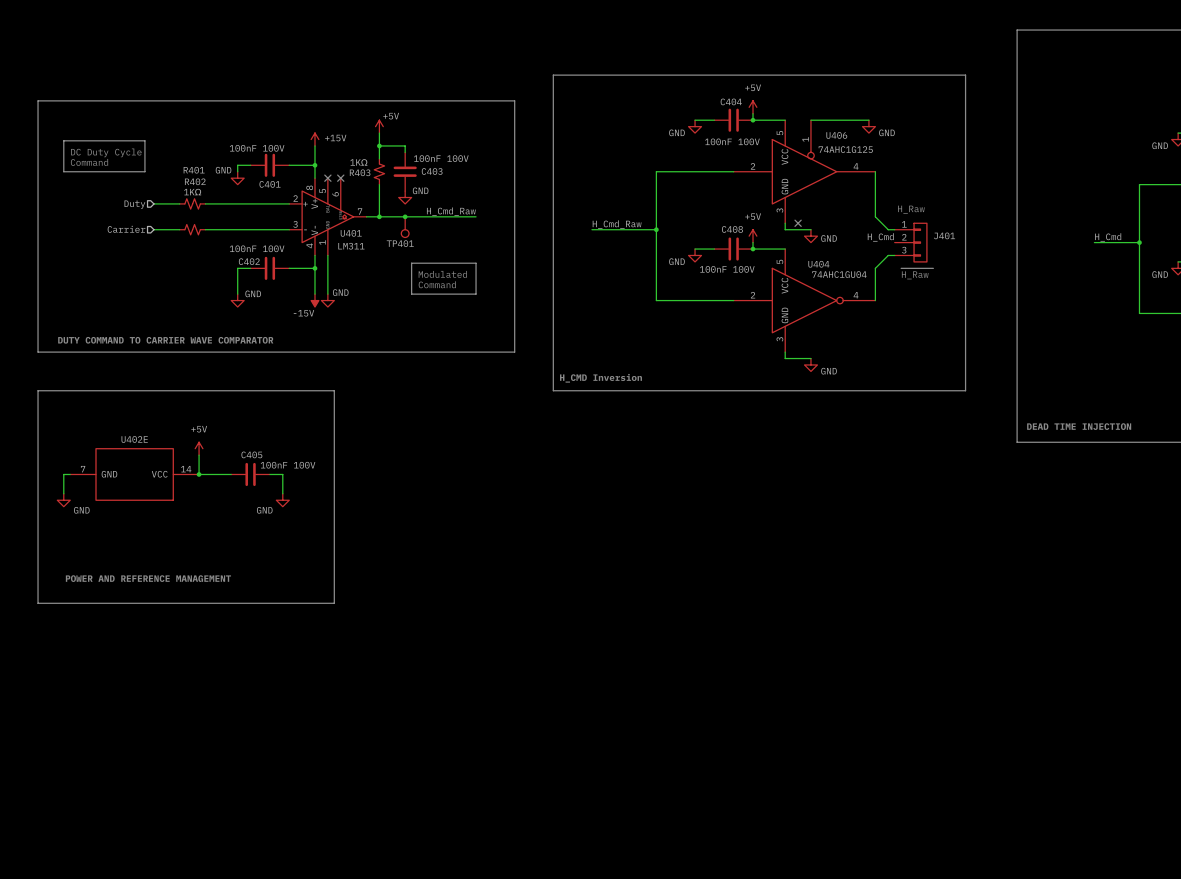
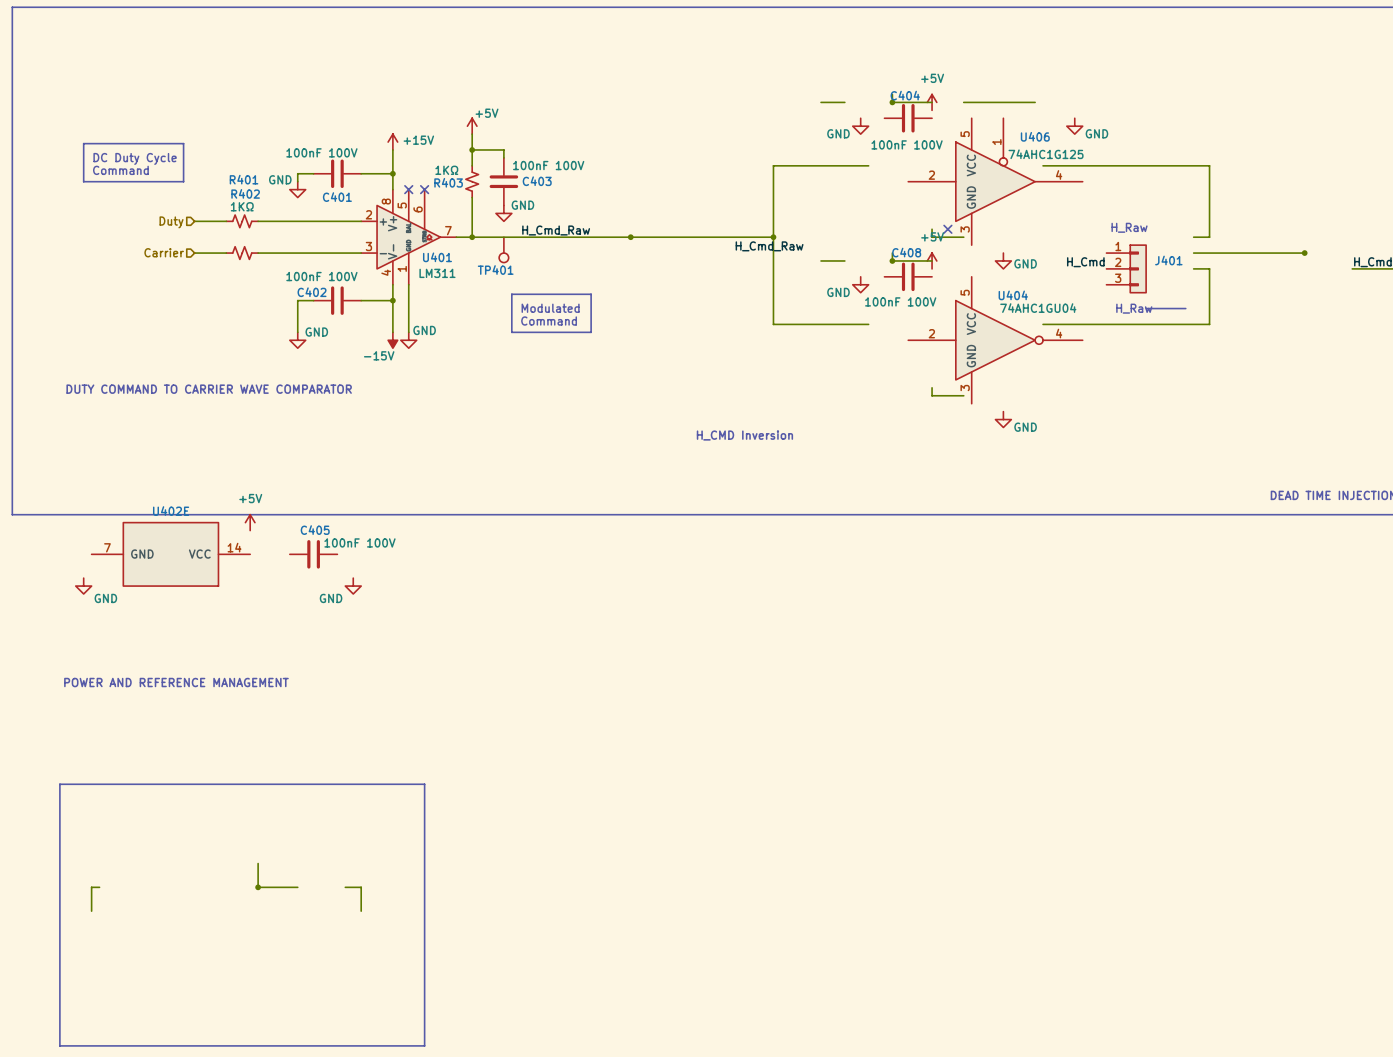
line: (1017, 30) (1017, 442) -> (1257, 7) (12, 7) (12, 514) (1257, 514)
line: (553, 75) (965, 75) (965, 390) (553, 390) (553, 75) -> none
line: (38, 100) (514, 100) (514, 352) (38, 352) (38, 100) -> none
junction: none -> (892, 102)
wire: (753, 113) (753, 120) (785, 120) -> (892, 94) (892, 102) (932, 102)
wire: (695, 120) (714, 120) -> (821, 102) (844, 102)
junction: (753, 120) -> none
wire: (810, 120) (868, 120) -> (963, 102) (1035, 102)
wire: none -> (1043, 165) (1209, 165) (1209, 237) (1193, 237)
wire: (733, 171) (656, 171) (656, 300) (733, 300) -> (868, 165) (773, 165) (773, 324) (868, 324)
wire: (875, 171) (875, 216) (888, 229) (894, 229) -> none
no-connect mark: none -> (947, 229)
junction: (405, 216) -> none
wire: none -> (591, 237) (773, 237)
junction: none -> (630, 237)
junction: none -> (773, 237)
wire: (785, 223) (785, 229) (810, 229) -> (932, 229) (932, 237) (963, 237)
no-connect mark: (798, 223) -> none
wire: (591, 229) (656, 229) -> none
junction: (656, 229) -> none
wire: none -> (1193, 253) (1304, 253)
junction: none -> (1304, 253)
junction: none -> (892, 260)
wire: (753, 242) (753, 249) (785, 249) -> (892, 253) (892, 260) (932, 260)
wire: none -> (1193, 268) (1209, 268) (1209, 324) (1043, 324)
wire: (695, 249) (714, 249) -> (821, 260) (844, 260)
junction: (753, 249) -> none
wire: (894, 255) (888, 255) (875, 268) (875, 300) -> none
line: (901, 268) (933, 268) -> (1146, 308) (1185, 308)
wire: (785, 352) (785, 358) (810, 358) -> (932, 387) (932, 395) (963, 395)
line: (38, 390) (38, 603) (334, 603) (334, 390) (38, 390) -> none
wire: (199, 455) (199, 474) (231, 474) -> none
wire: (70, 474) (63, 474) (63, 493) -> none
junction: (199, 474) -> none
wire: (269, 474) (282, 474) (282, 493) -> none
line: none -> (59, 784) (424, 784) (424, 1045) (59, 1045) (59, 784)
wire: none -> (258, 863) (258, 887) (297, 887)
wire: none -> (99, 887) (91, 887) (91, 911)
junction: none -> (258, 887)
wire: none -> (345, 887) (361, 887) (361, 911)

